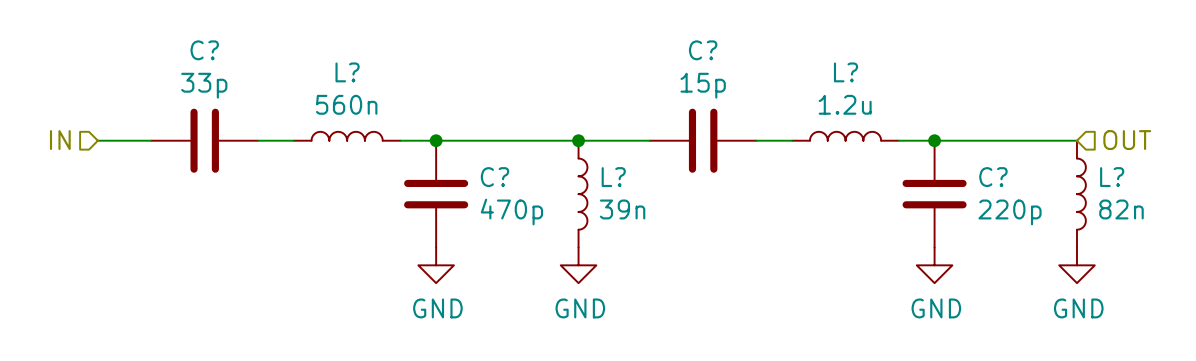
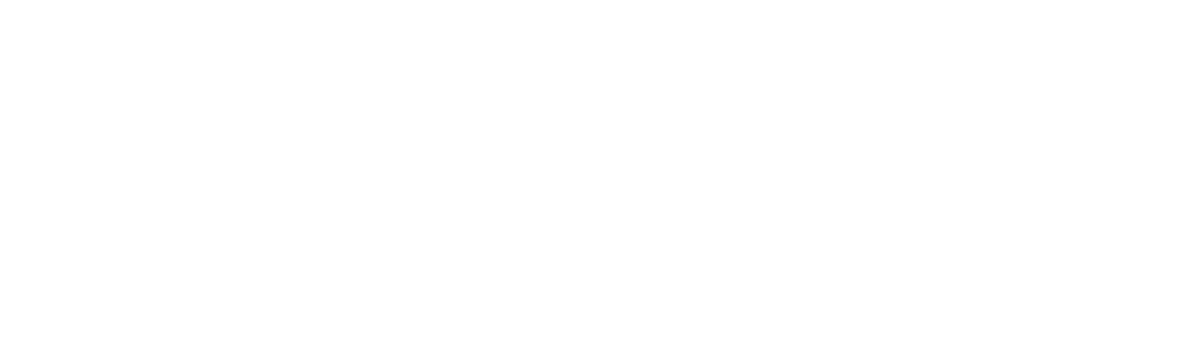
L?: 560n (347, 136) -> none
L?: 1.2u (845, 136) -> none
hierarchical label: IN (60, 140) -> none
wire: (97, 140) (151, 140) -> none
C?: 33p (204, 140) -> none
wire: (258, 140) (293, 140) -> none
wire: (400, 140) (649, 140) -> none
junction: (436, 140) -> none
junction: (578, 140) -> none
C?: 15p (703, 140) -> none
wire: (756, 140) (792, 140) -> none
wire: (898, 140) (1076, 140) -> none
junction: (934, 140) -> none
hierarchical label: OUT (1127, 140) -> none
C?: 470p (436, 194) -> none
L?: 39n (582, 194) -> none
C?: 220p (934, 194) -> none
L?: 82n (1081, 194) -> none
power symbol: GND (436, 265) -> none
power symbol: GND (578, 265) -> none
power symbol: GND (934, 265) -> none
power symbol: GND (1076, 265) -> none

